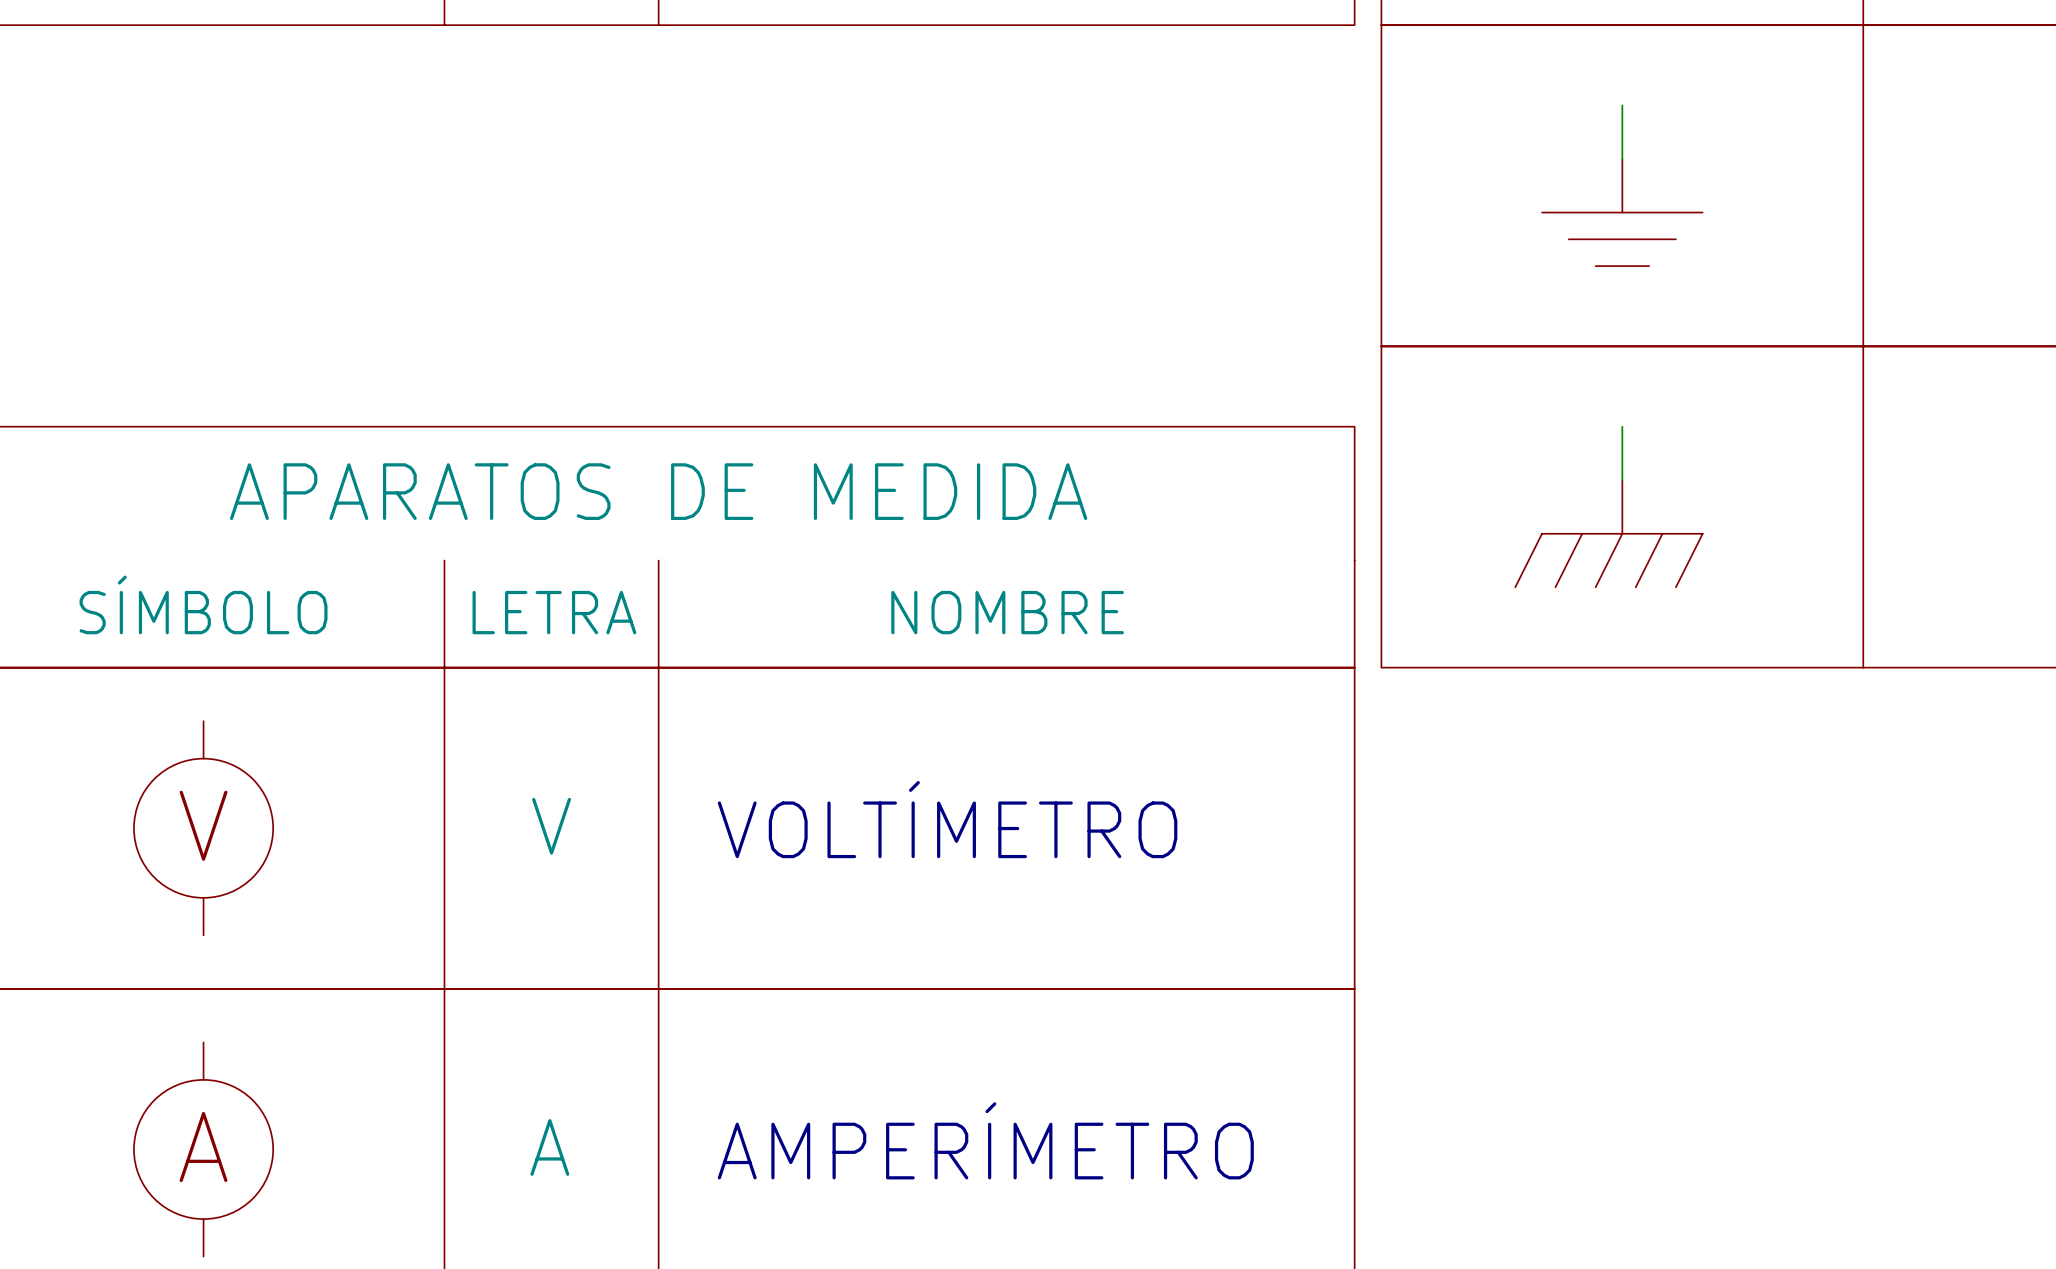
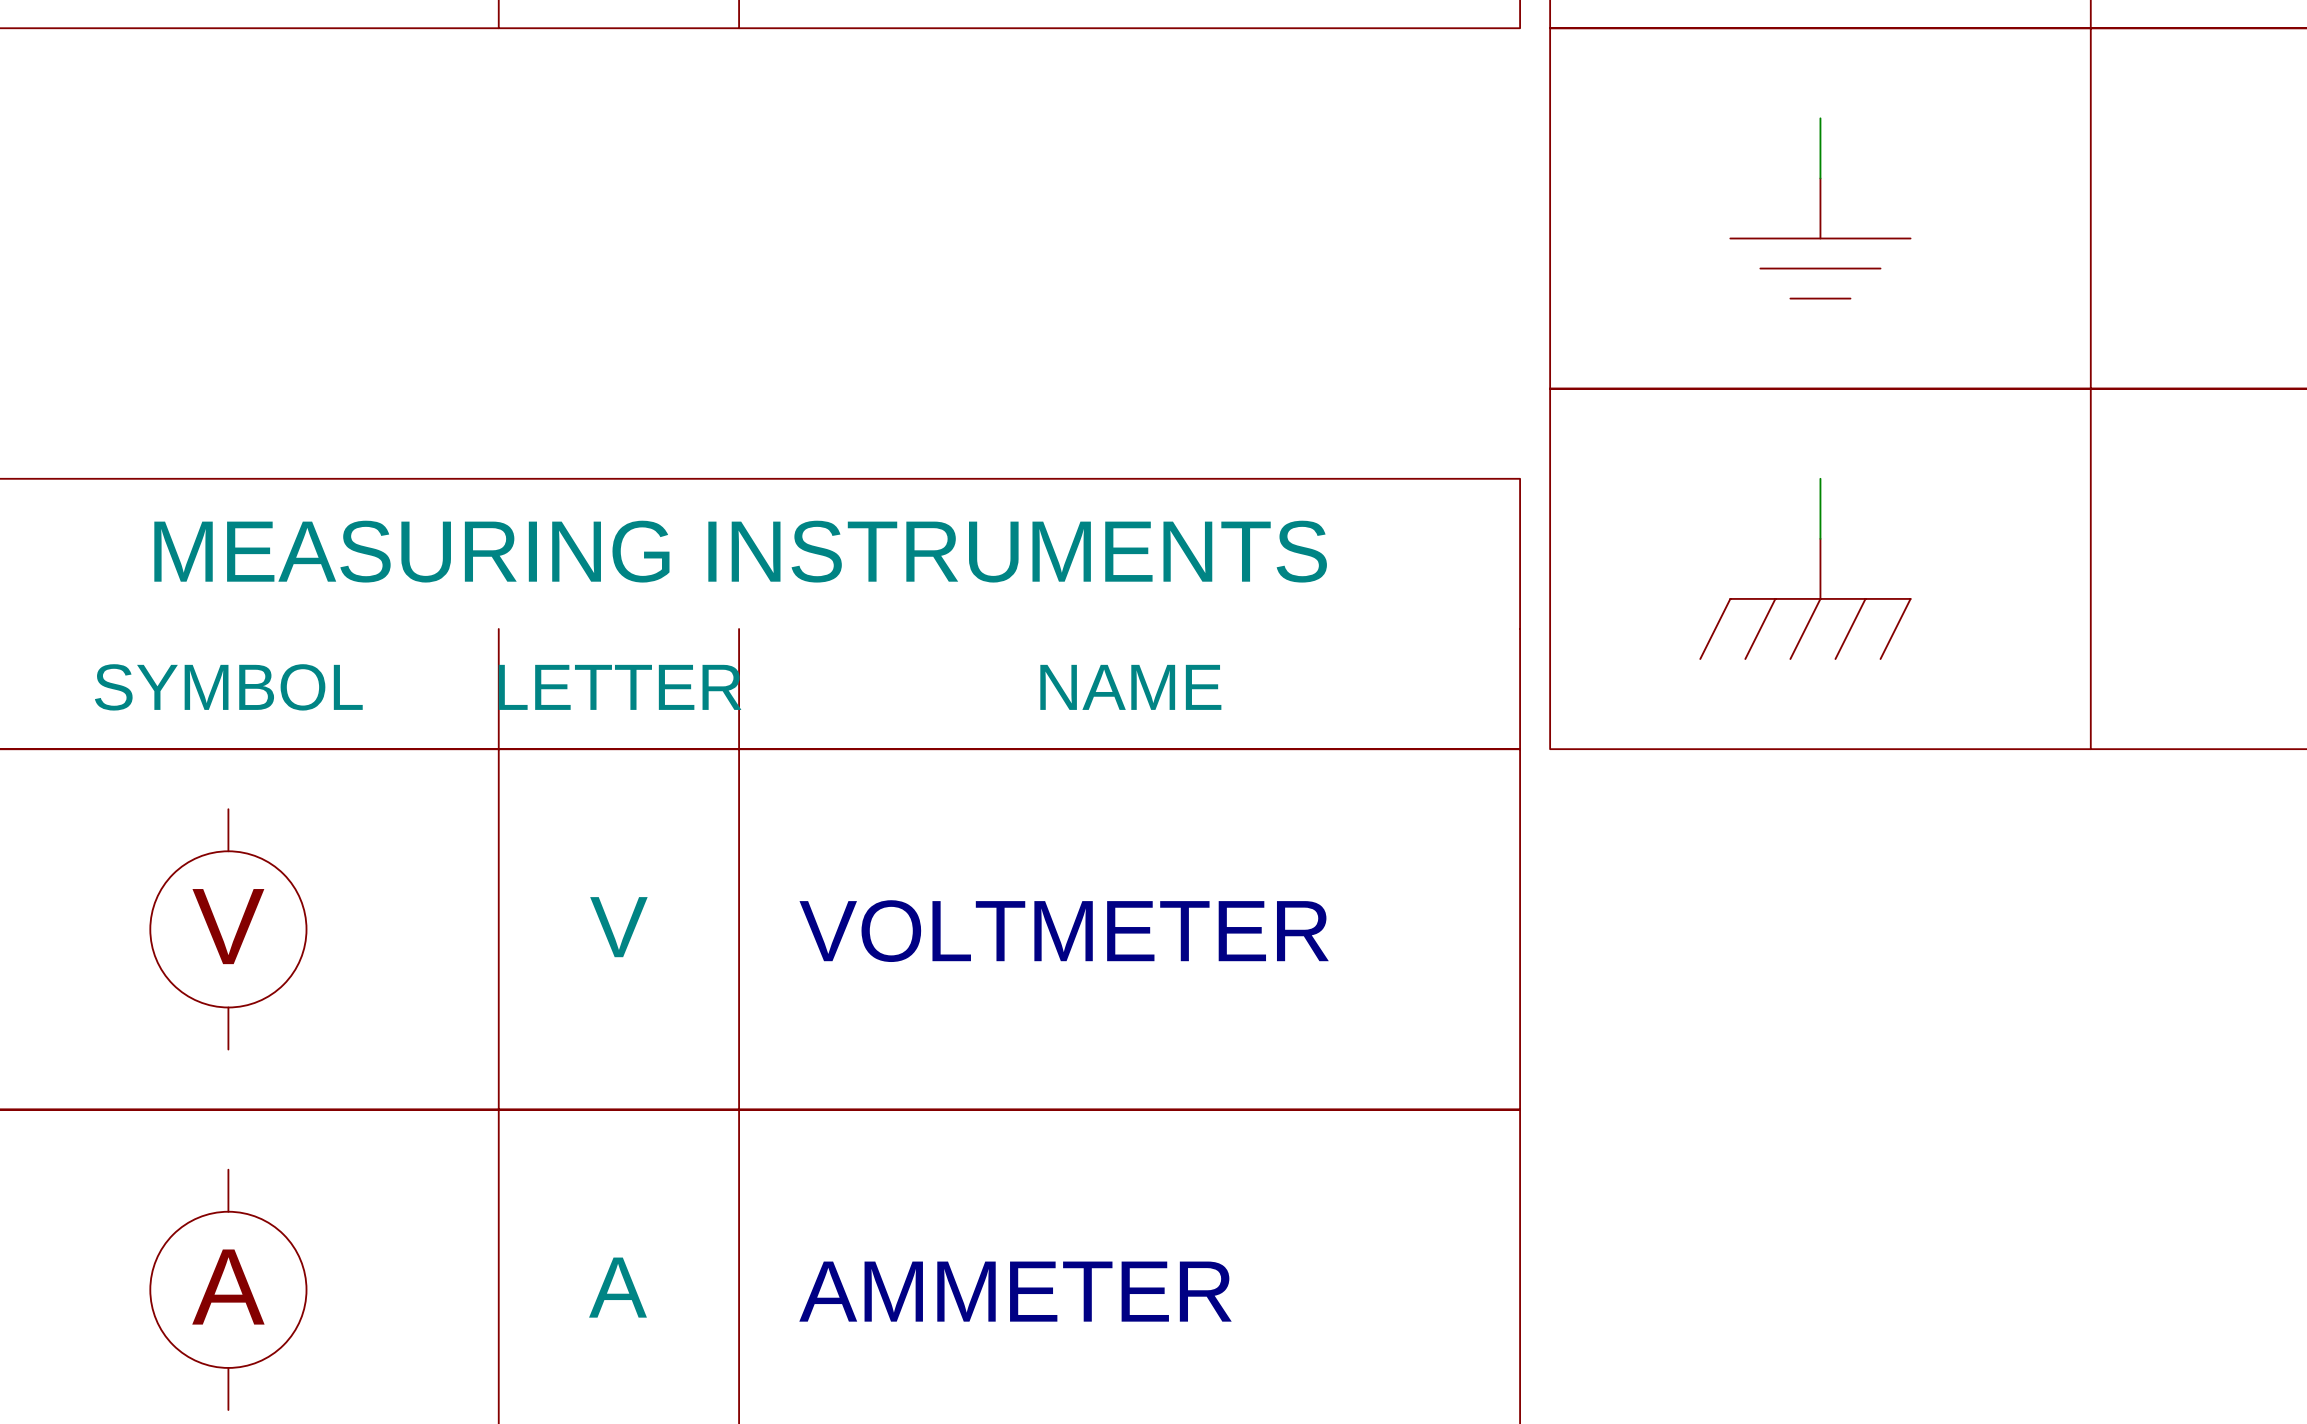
part text: APARATOS DE MEDIDA (658, 491) -> MEASURING INSTRUMENTS (740, 551)
part text: SÍMBOLO (203, 604) -> SYMBOL (228, 687)
part text: LETRA (554, 612) -> LETTER (620, 687)
part text: NOMBRE (1007, 612) -> NAME (1130, 687)
text: VOLTÍMETRO (947, 819) -> VOLTMETER (1064, 931)
text: AMPERÍMETRO (985, 1140) -> AMMETER (1015, 1291)

